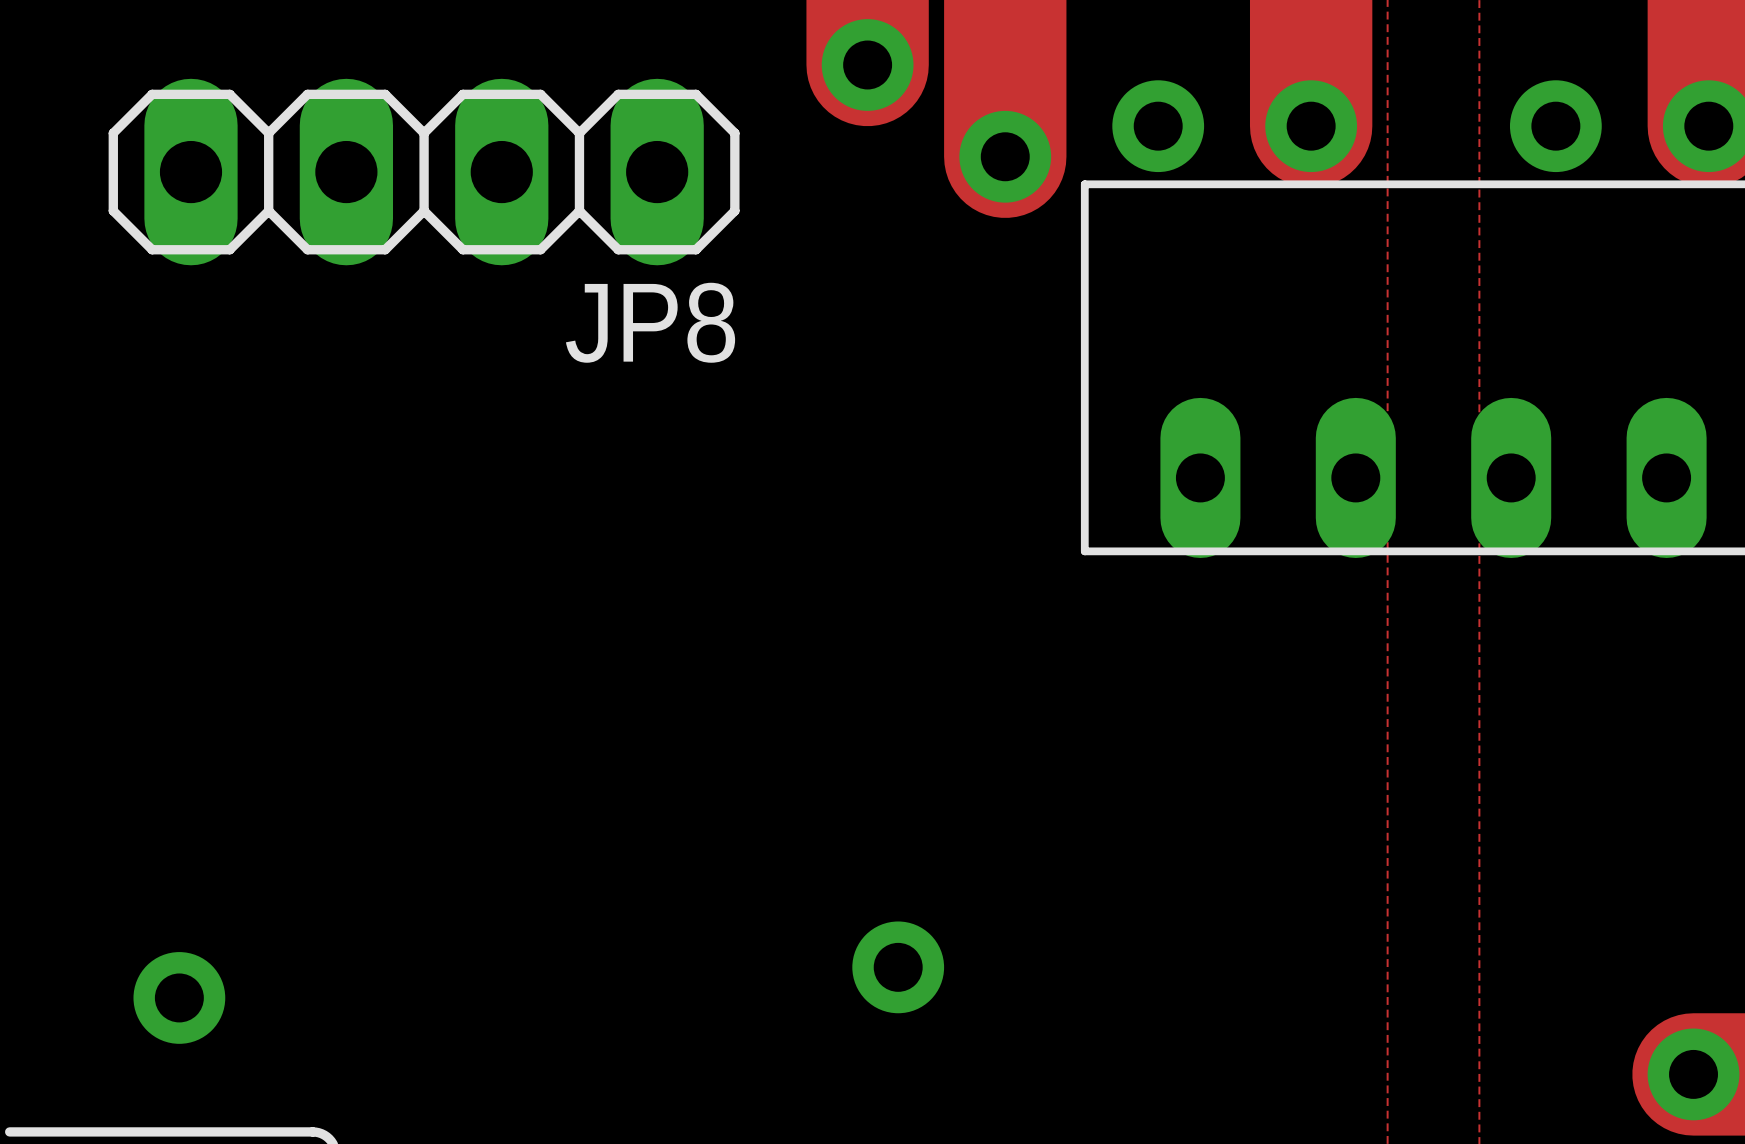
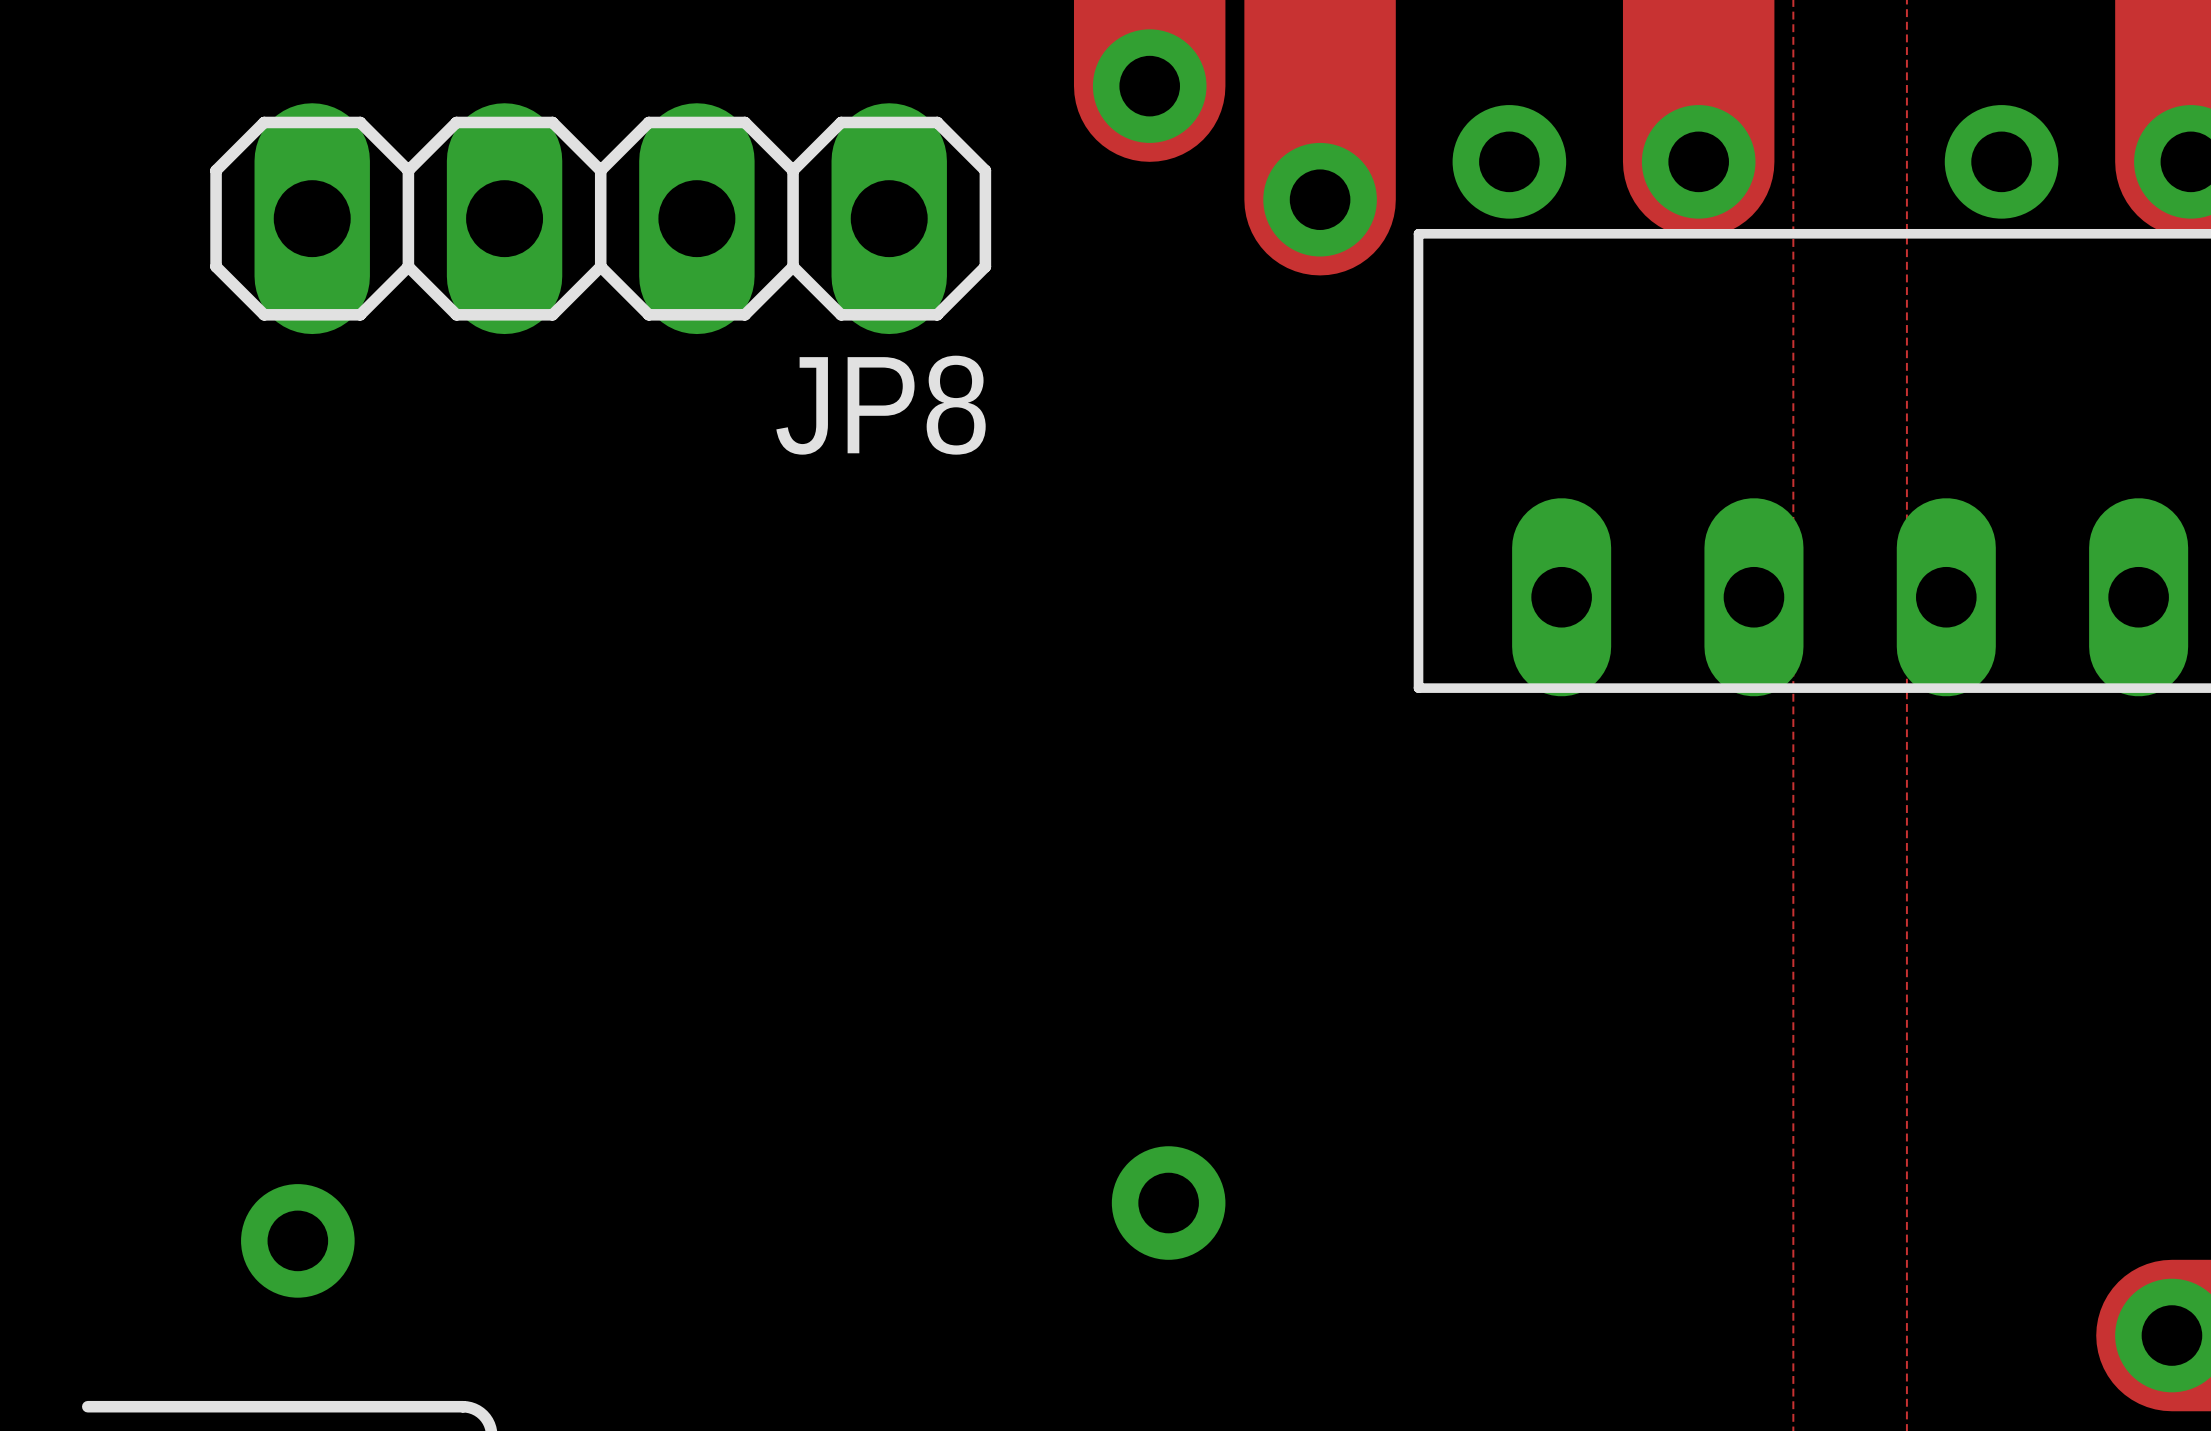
via position: (898, 967) -> (1168, 1203)

